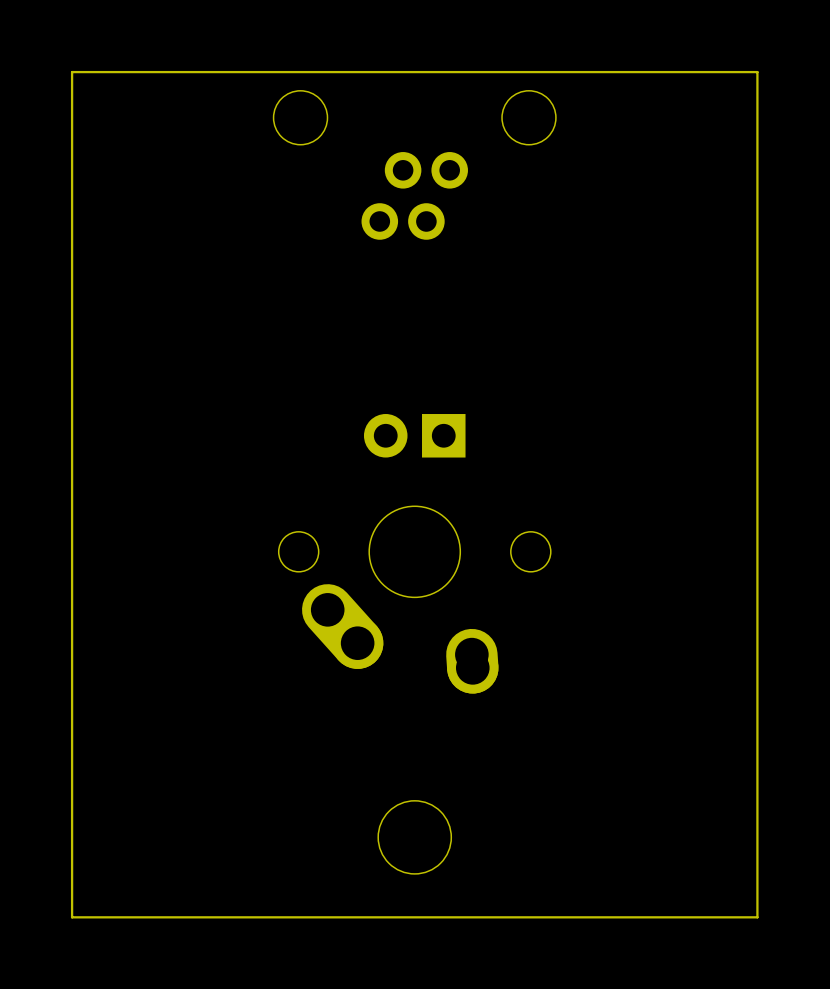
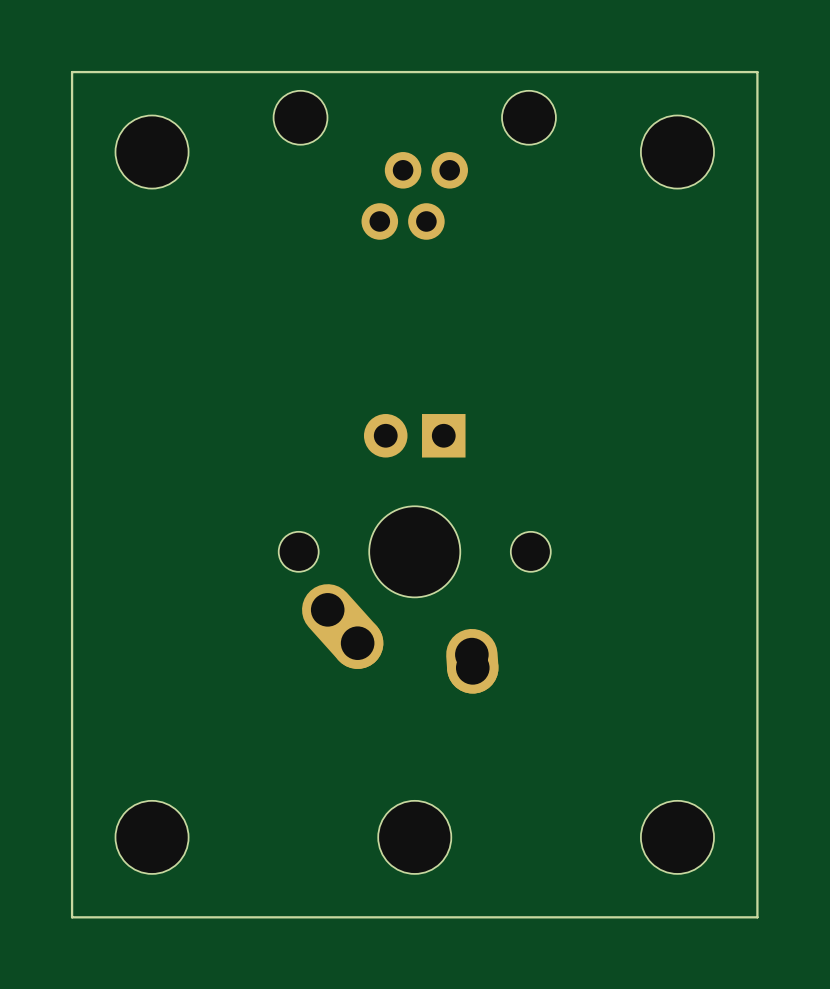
part: none -> (152, 152)
part: none -> (677, 152)
part: none -> (152, 837)
part: none -> (677, 837)

